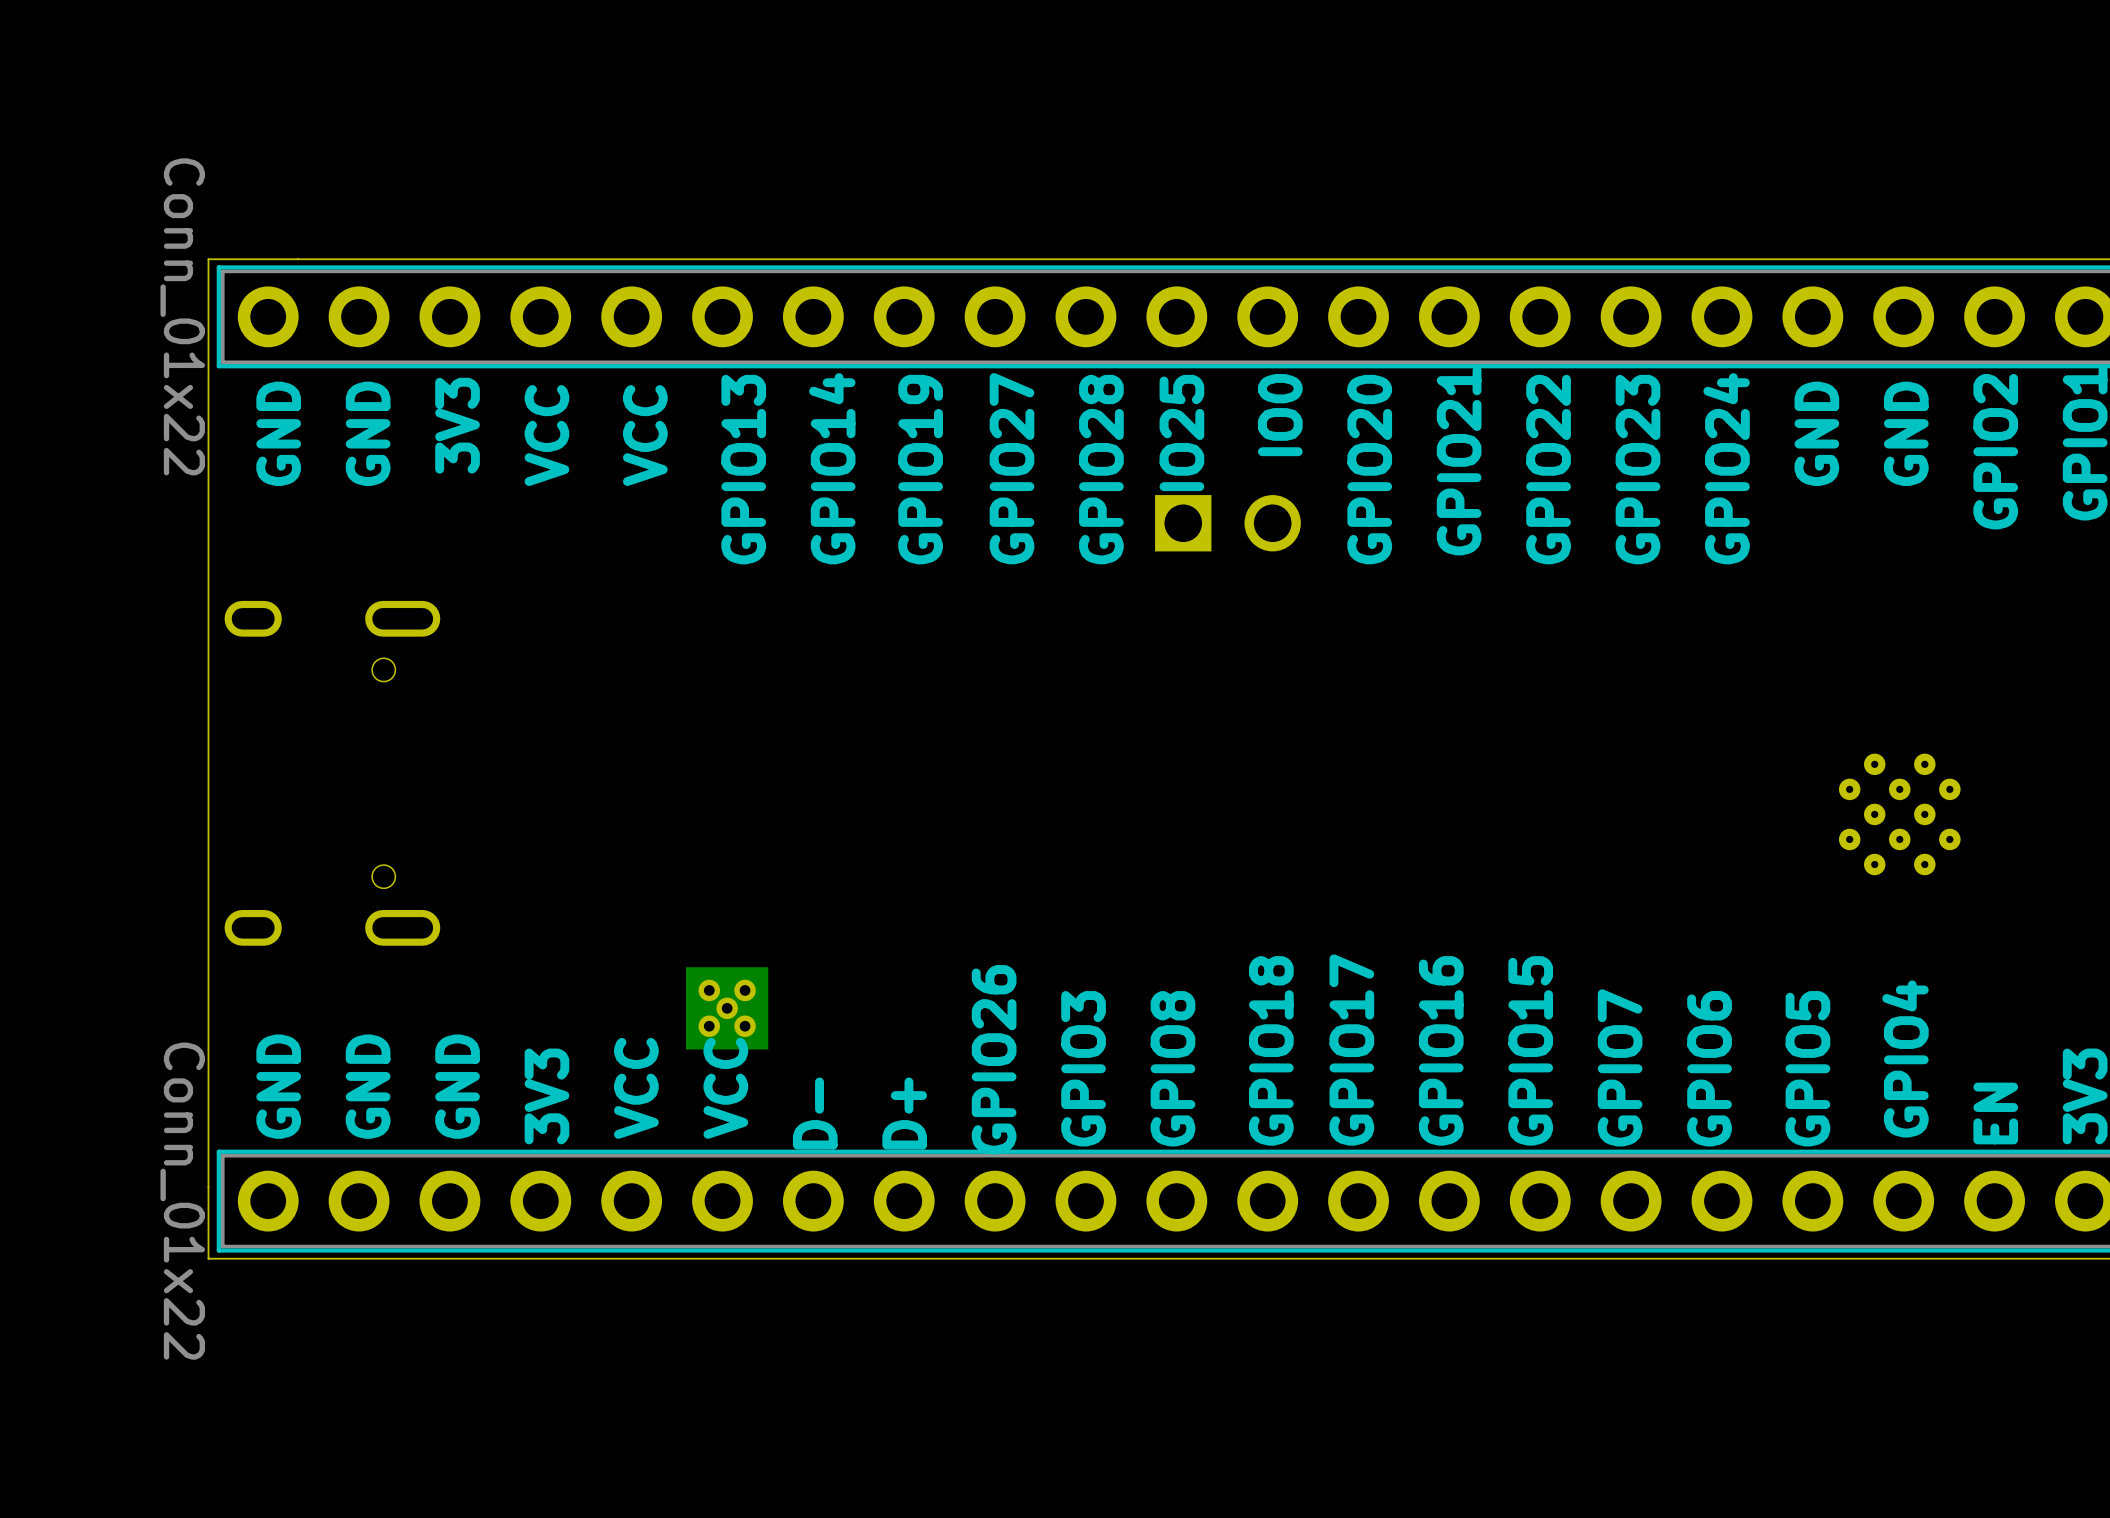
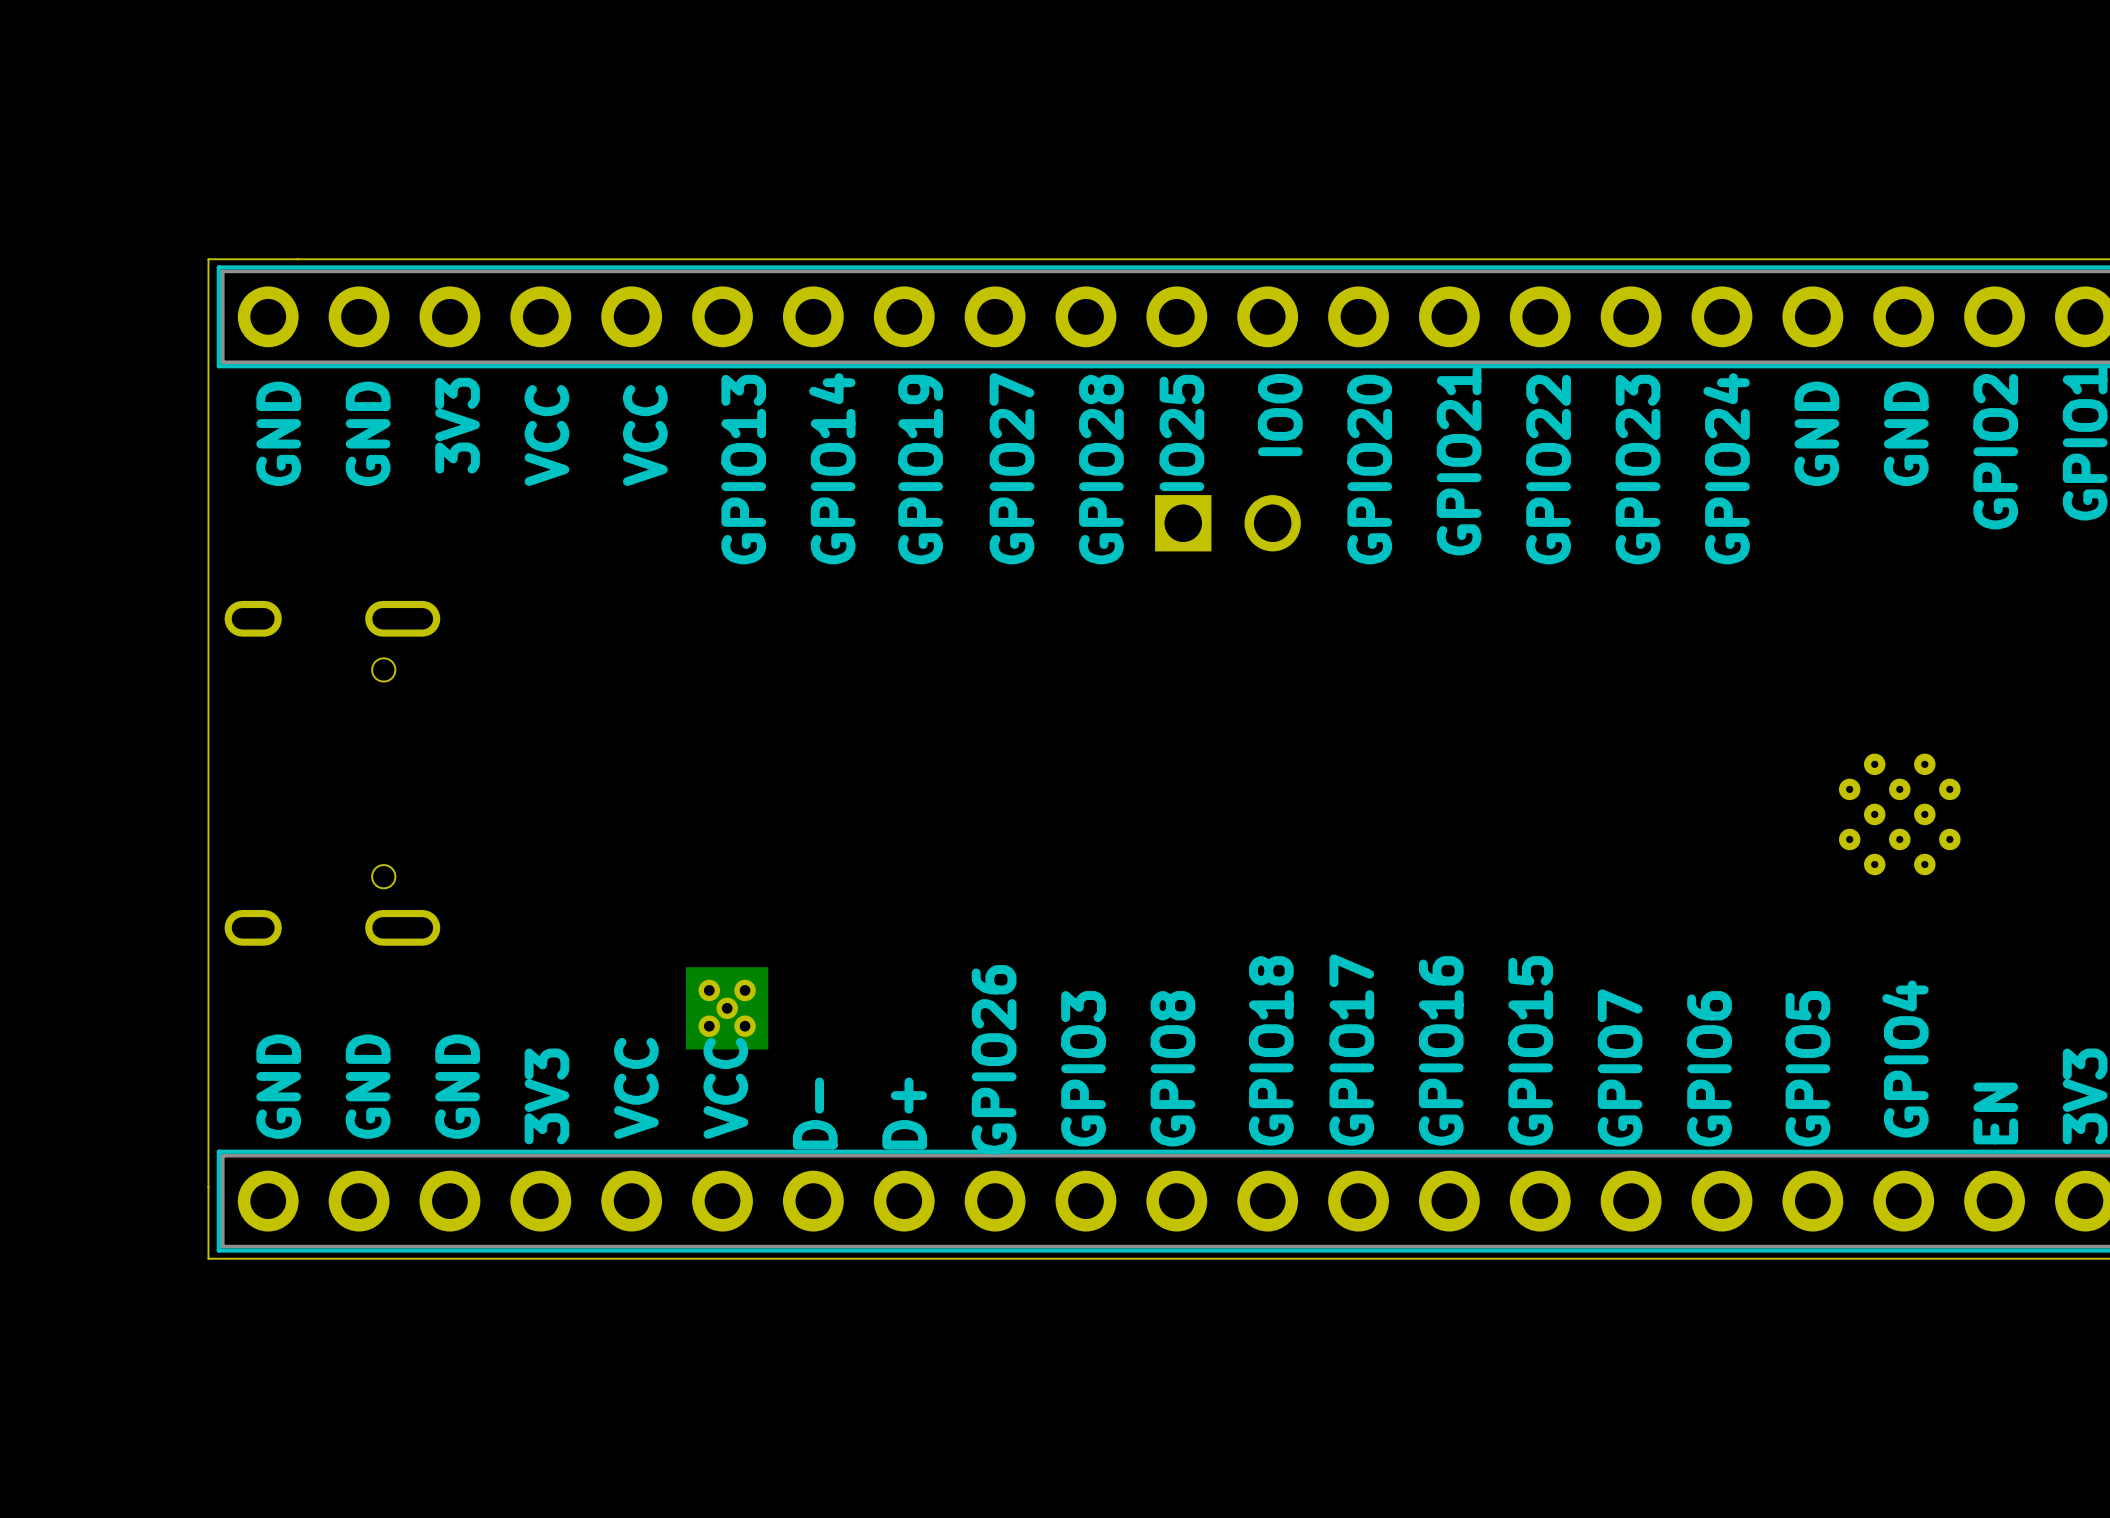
part value: Conn_01x22 (182, 316) -> none
part value: Conn_01x22 (182, 1201) -> none

